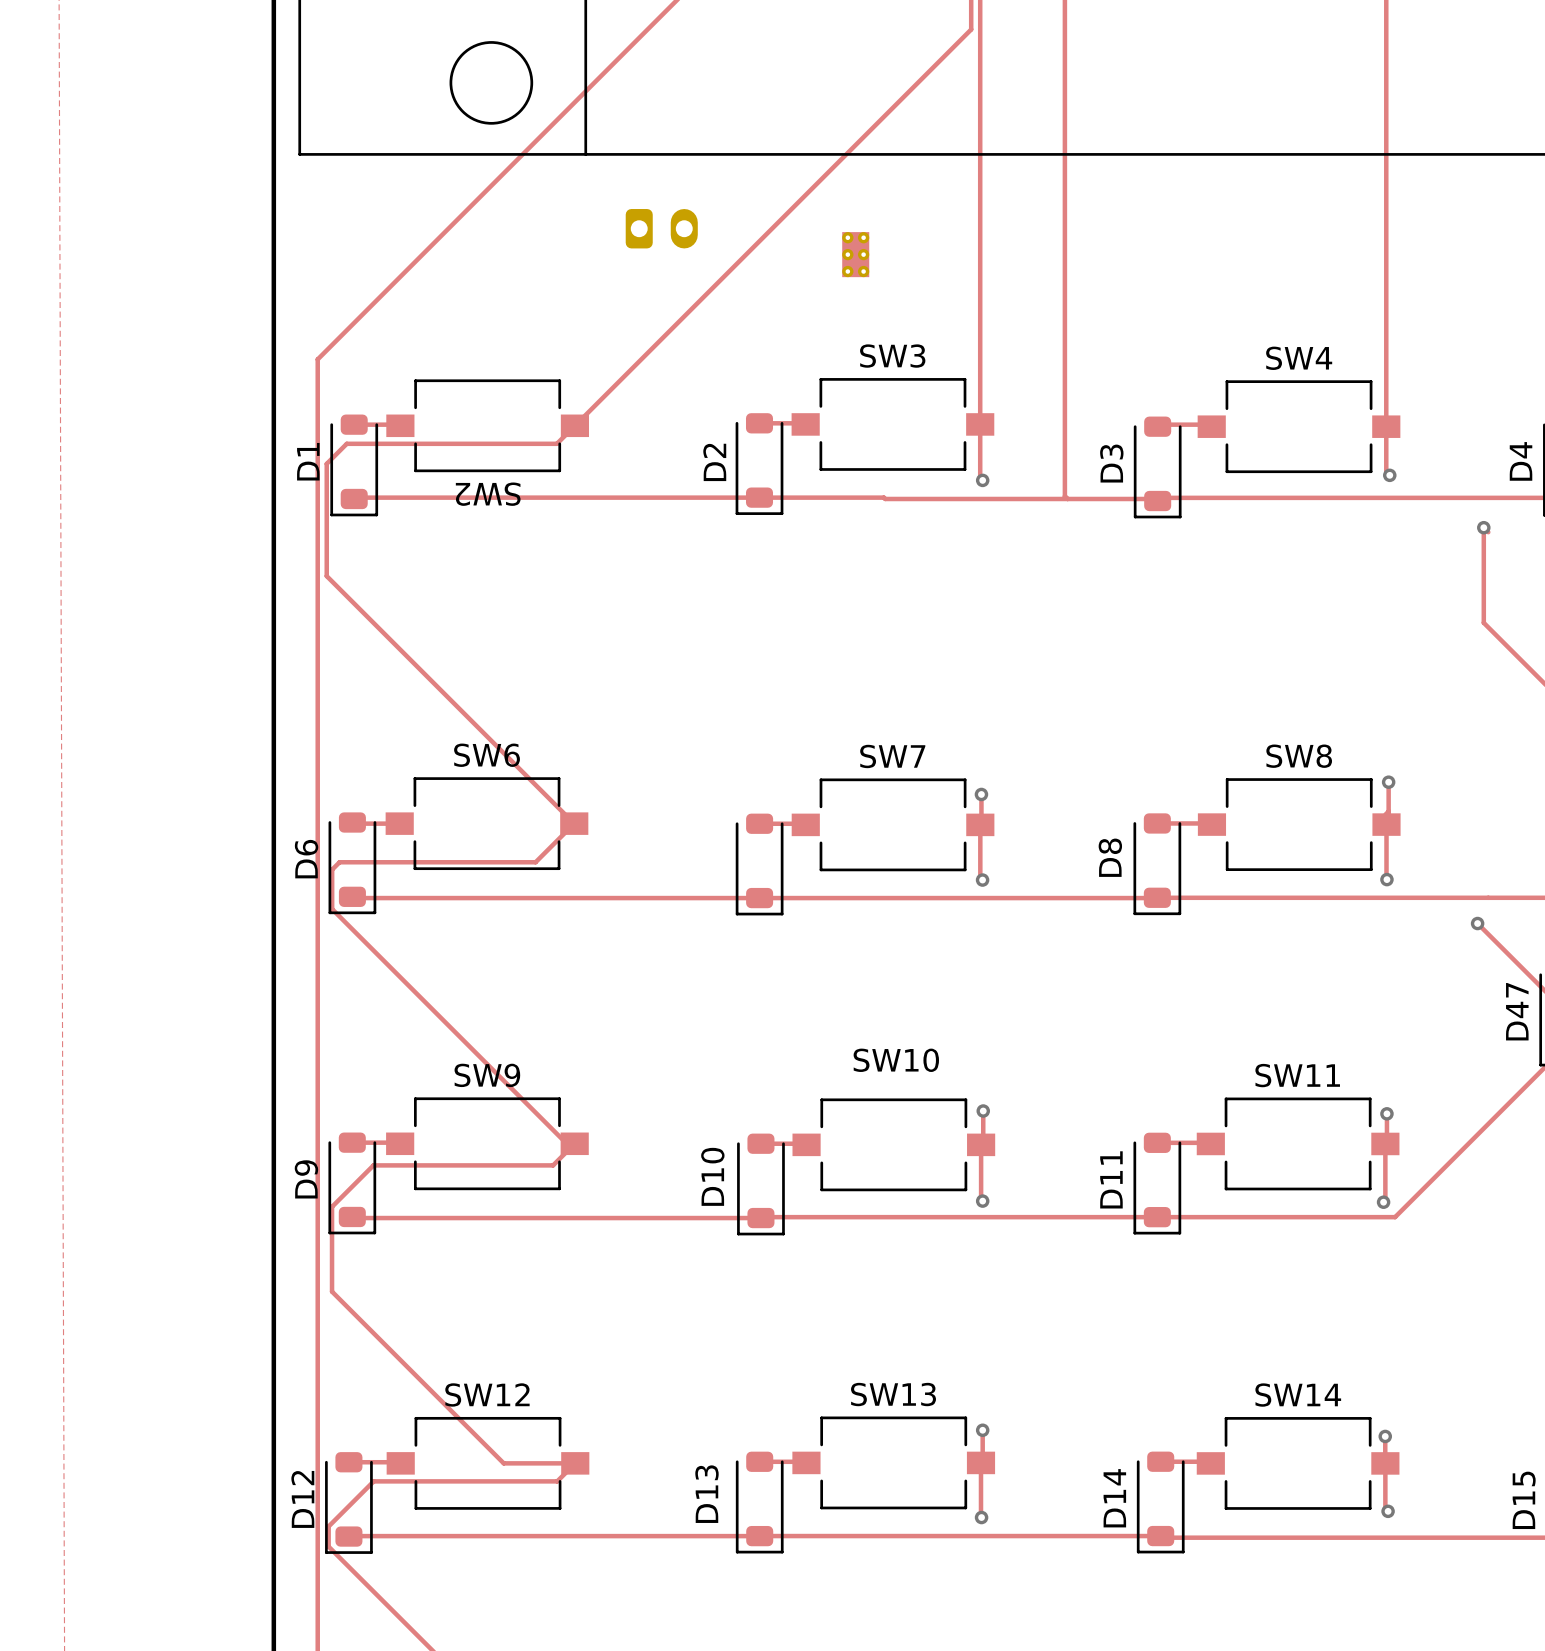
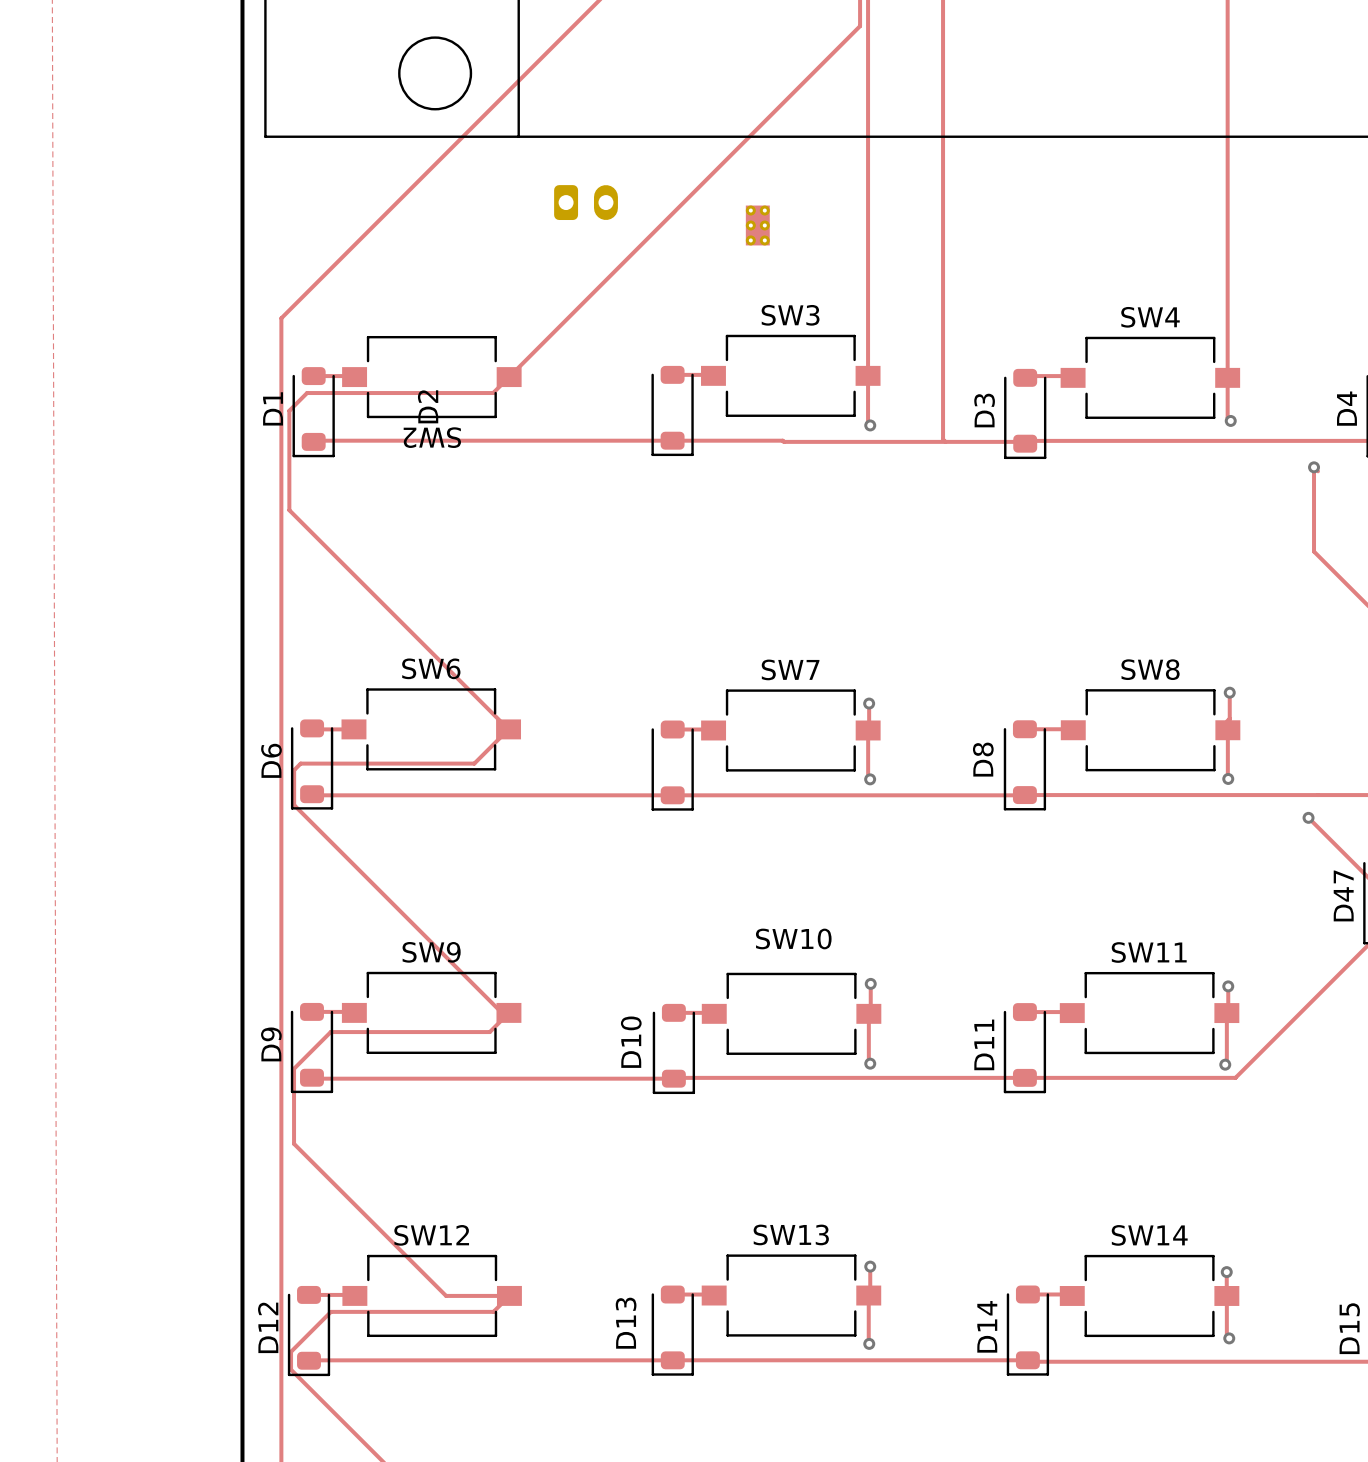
D2 name position: D2 (714, 462) -> D2 (428, 406)

